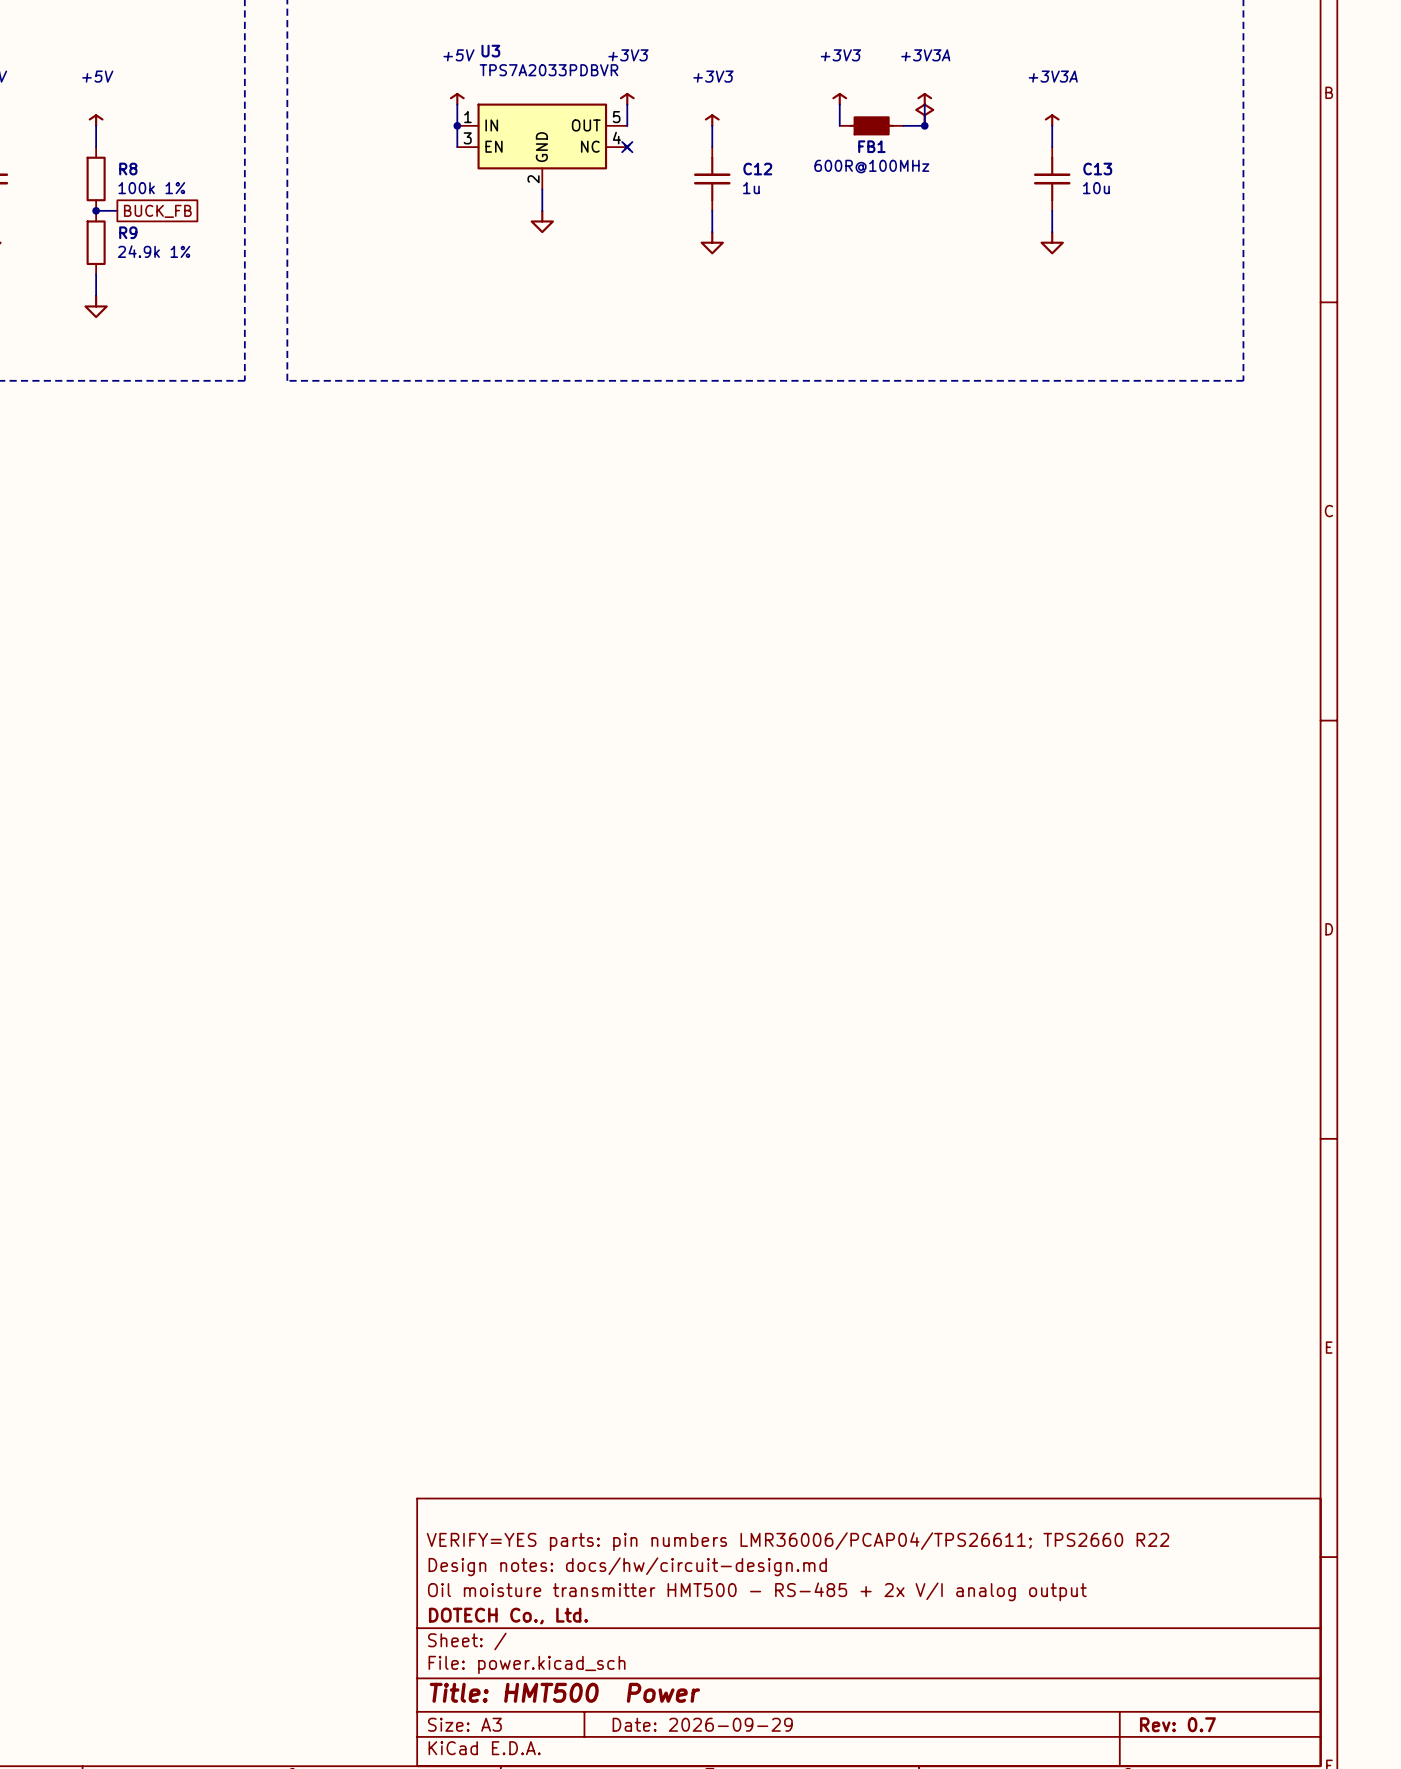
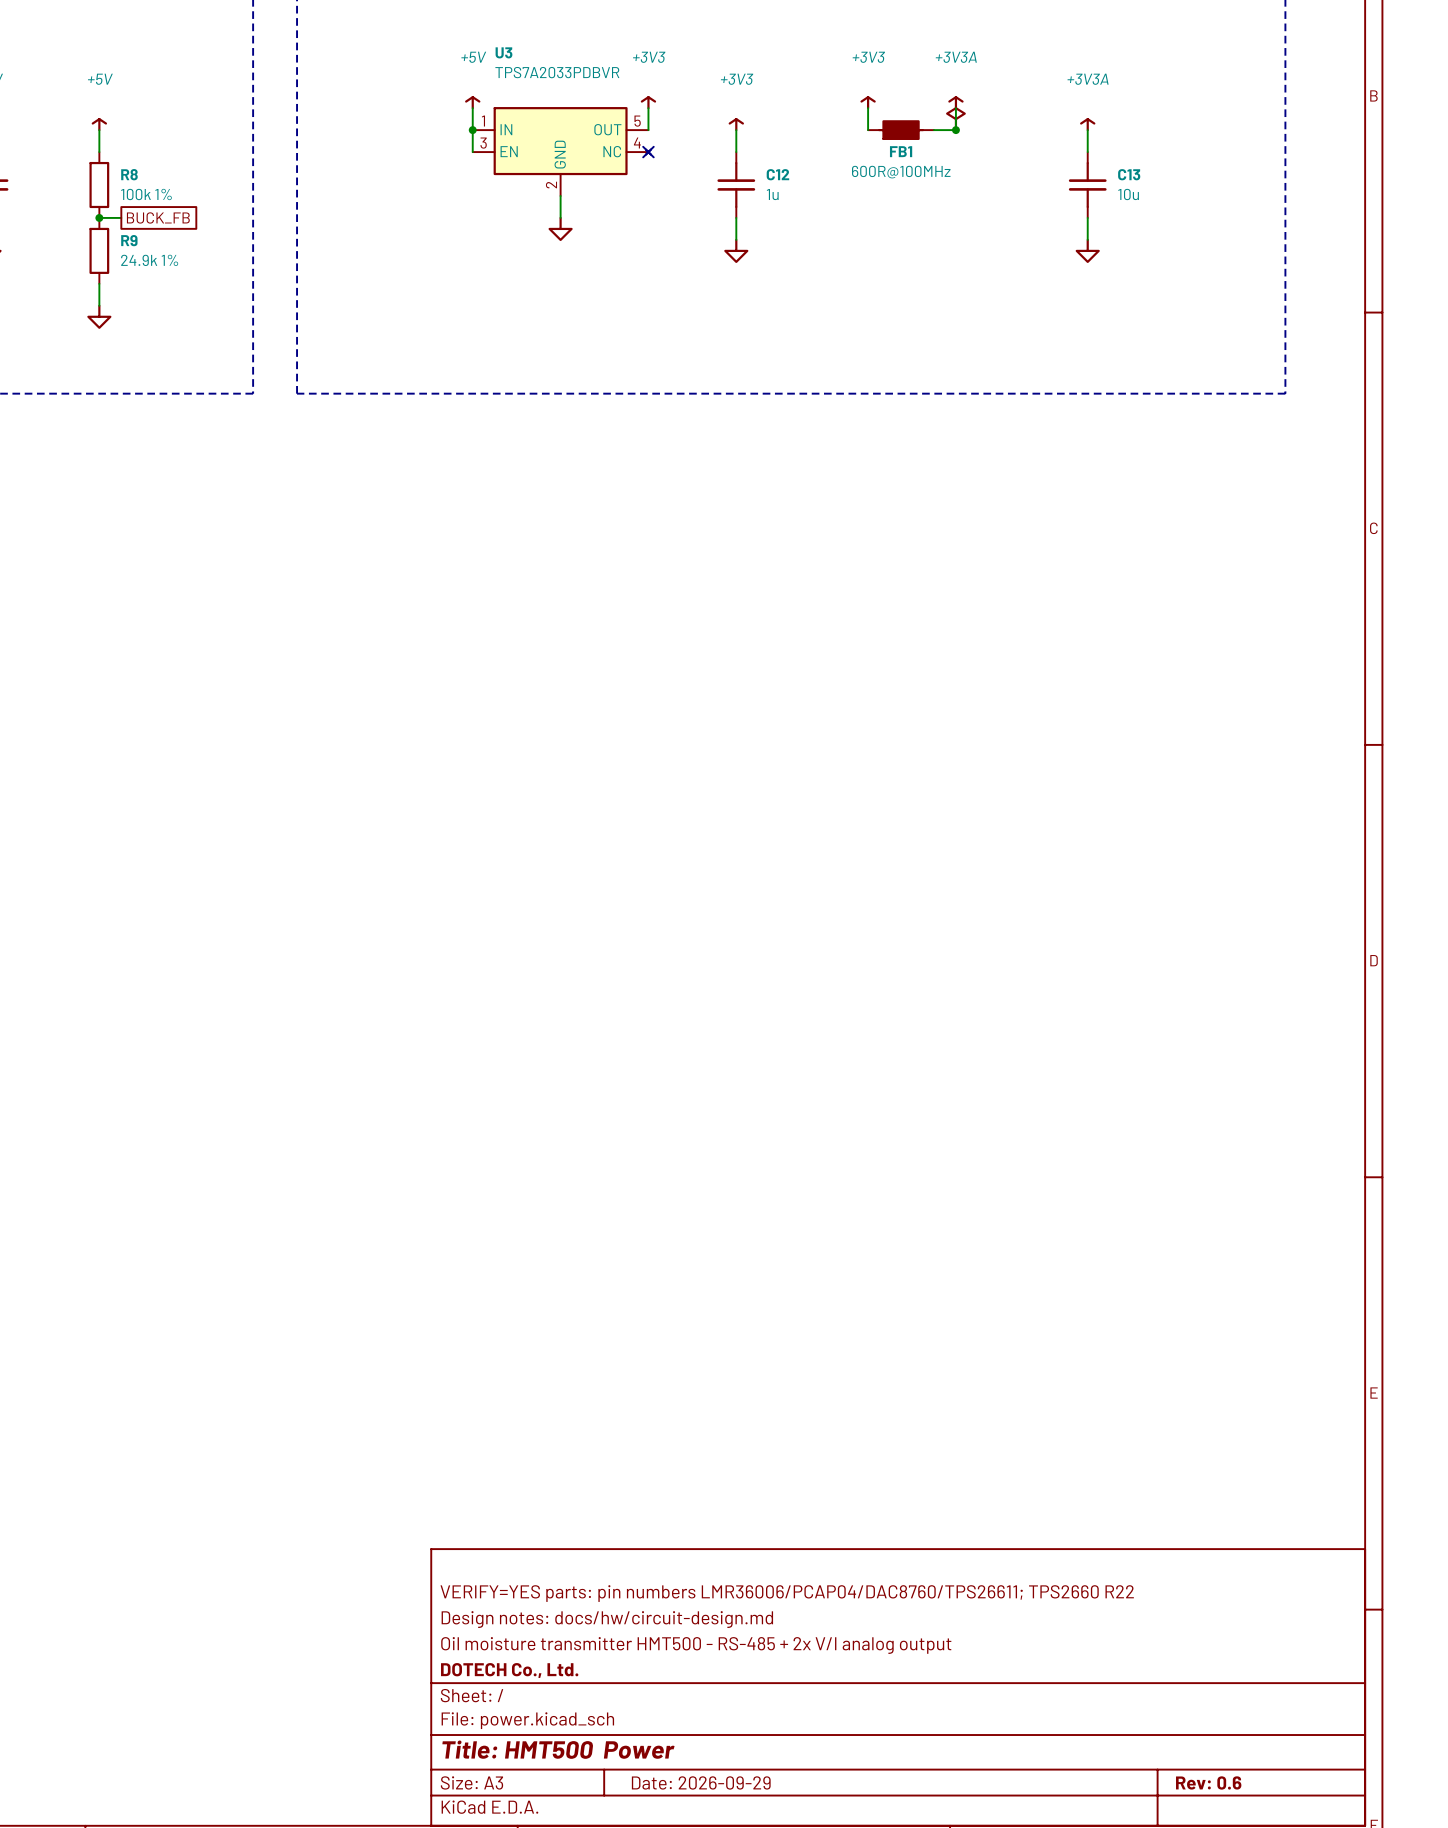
title block: VERIFY=YES parts: pin numbers LMR36006/PCAP04/TPS26611; TPS2660 R22 (798, 1541) -> VERIFY=YES parts: pin numbers LMR36006/PCAP04/DAC8760/TPS26611; TPS2660 R22 (787, 1593)
title block: Rev: 0.7 (1177, 1724) -> Rev: 0.6 (1208, 1782)

